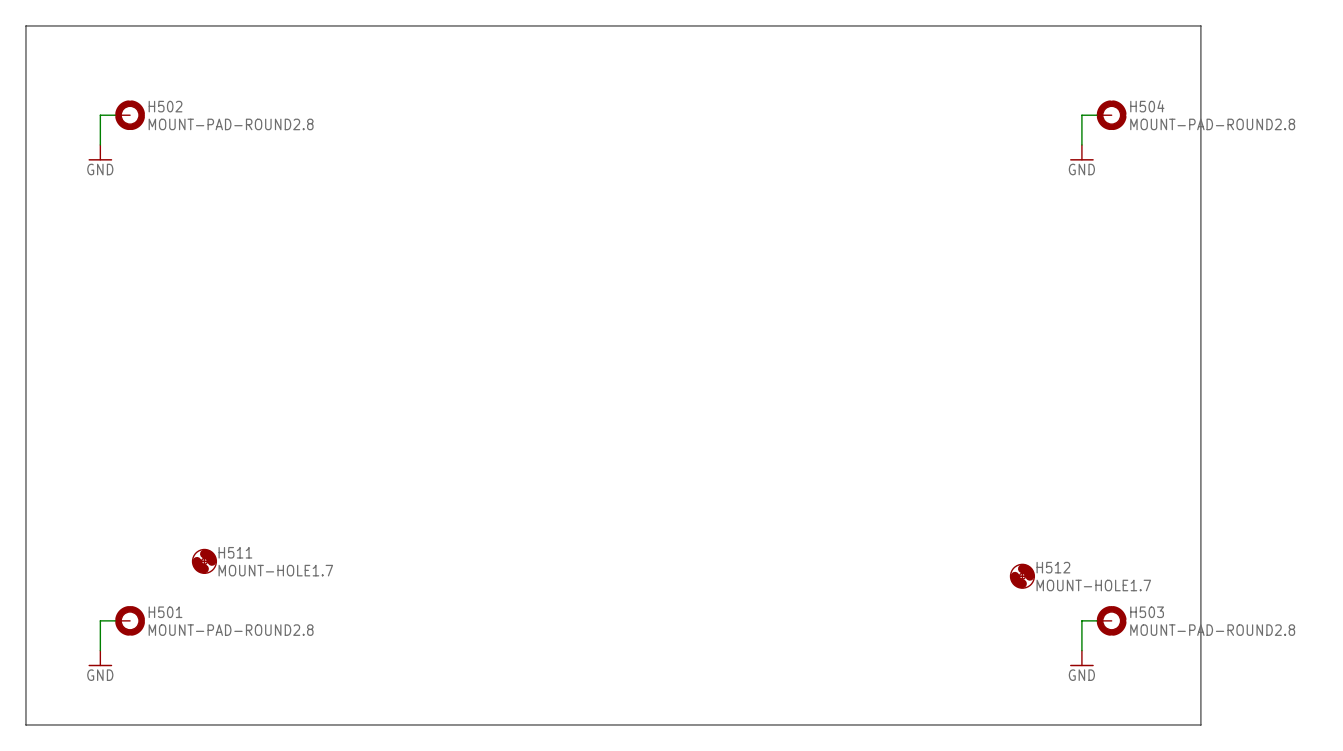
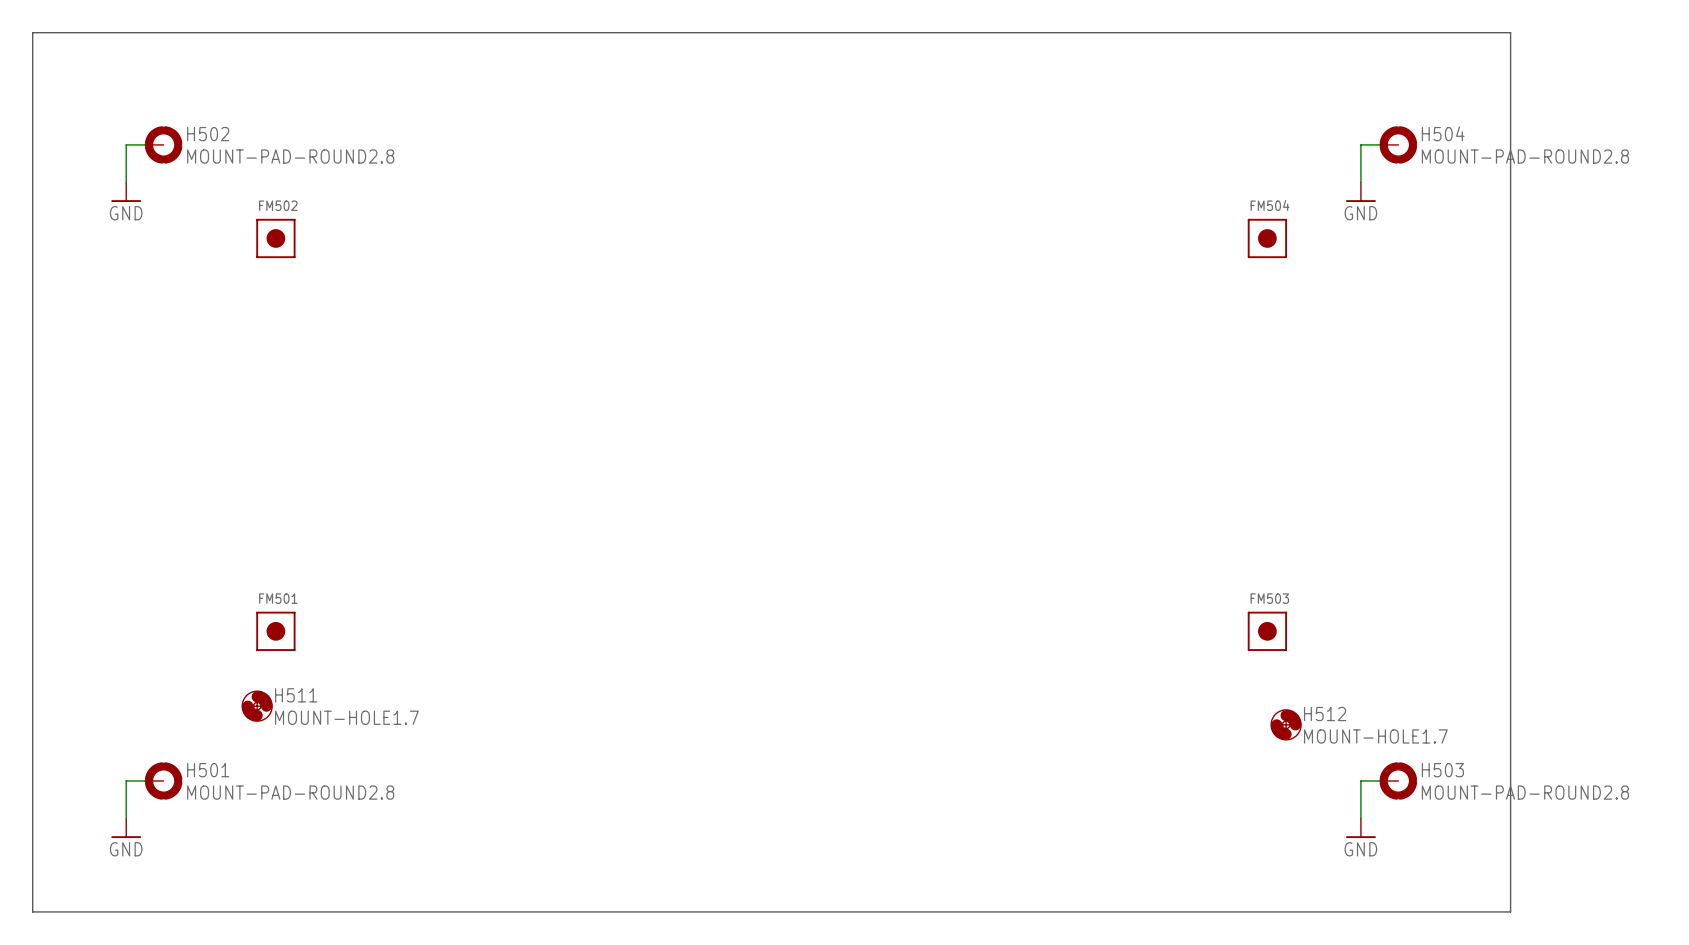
FM502: none -> (275, 238)
FM504: none -> (1267, 238)
FM501: none -> (275, 631)
FM503: none -> (1267, 631)

